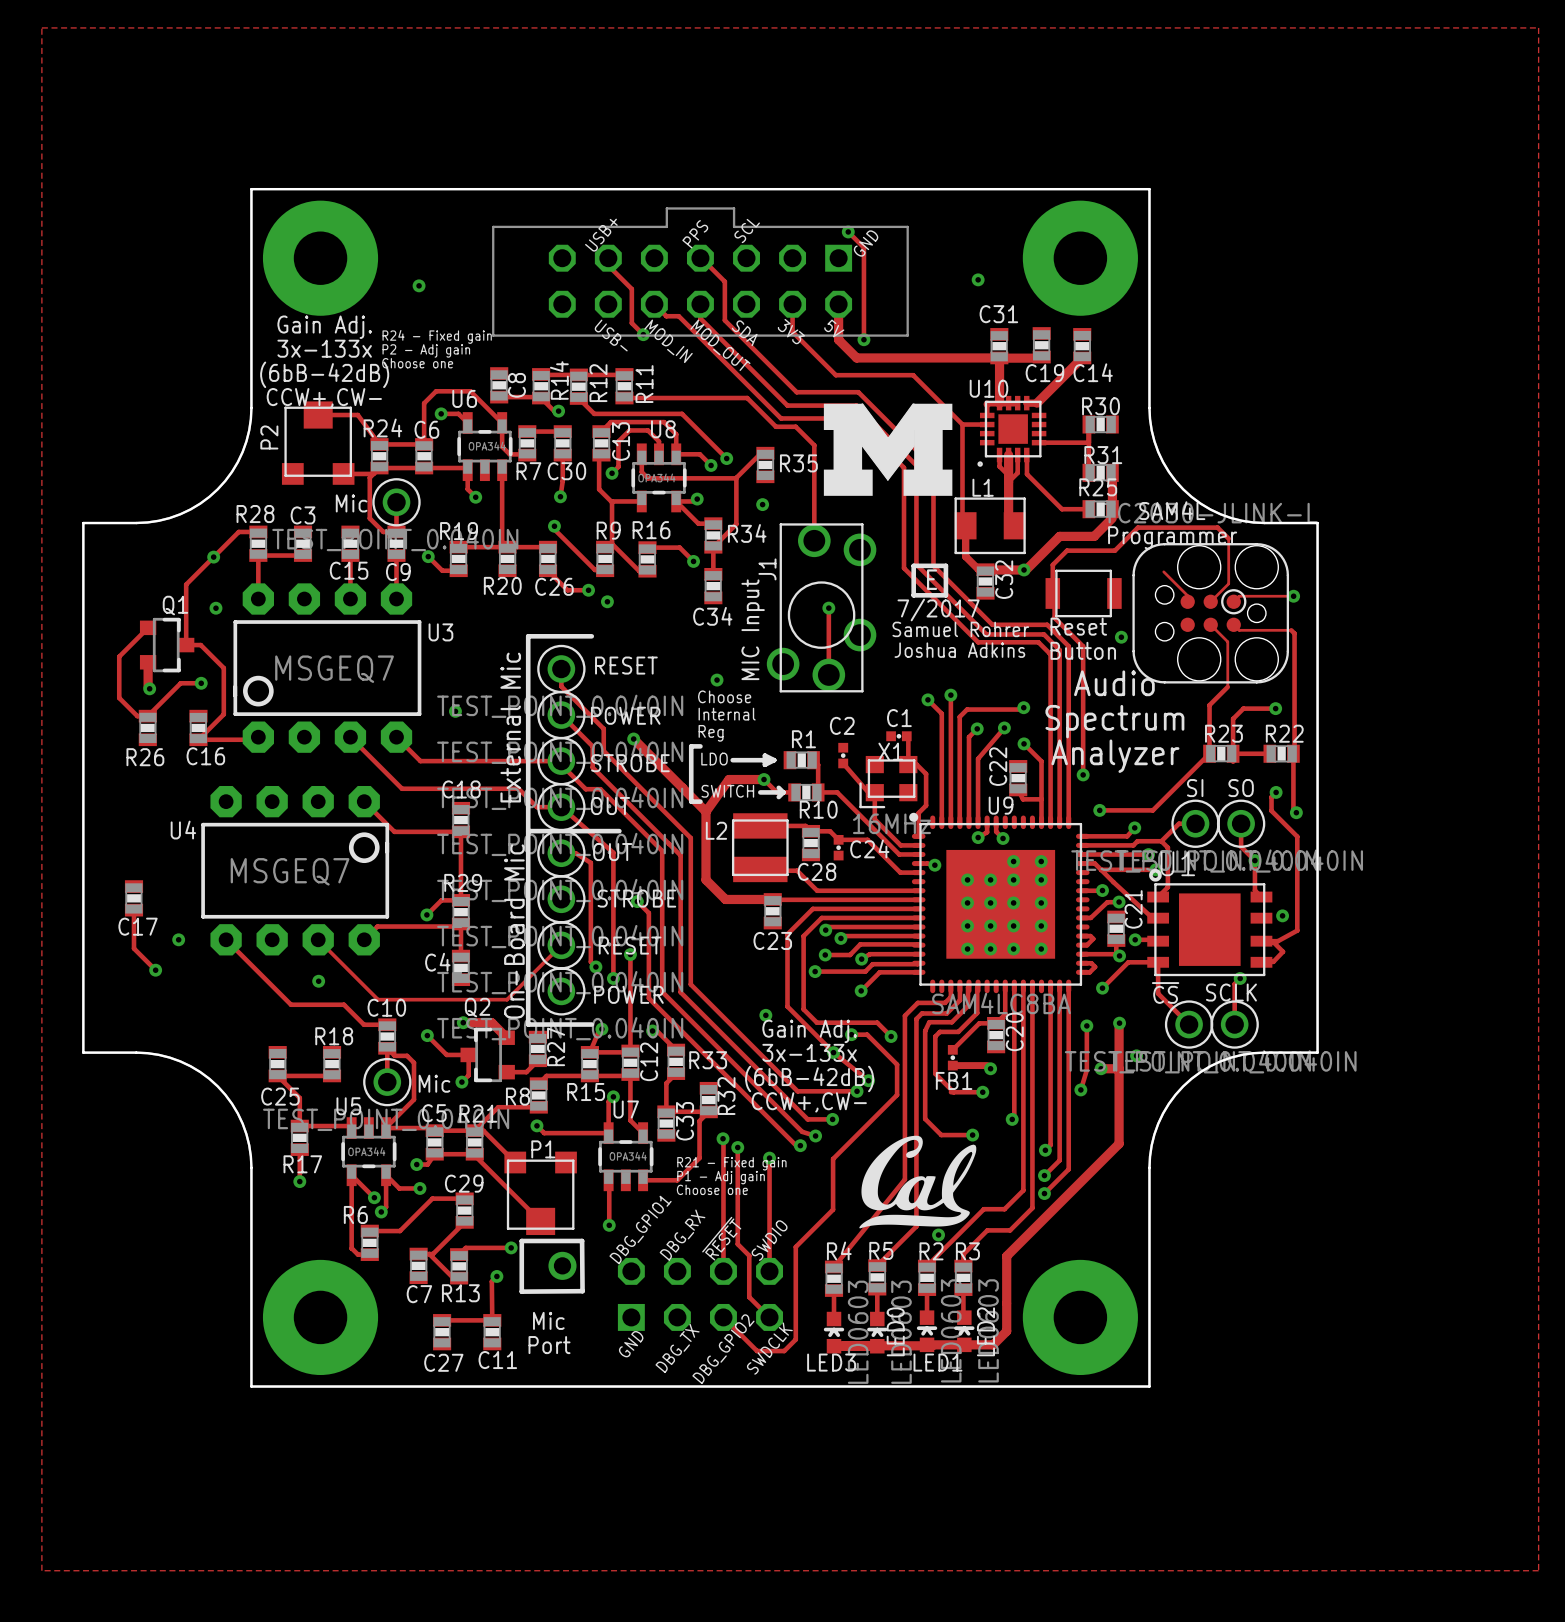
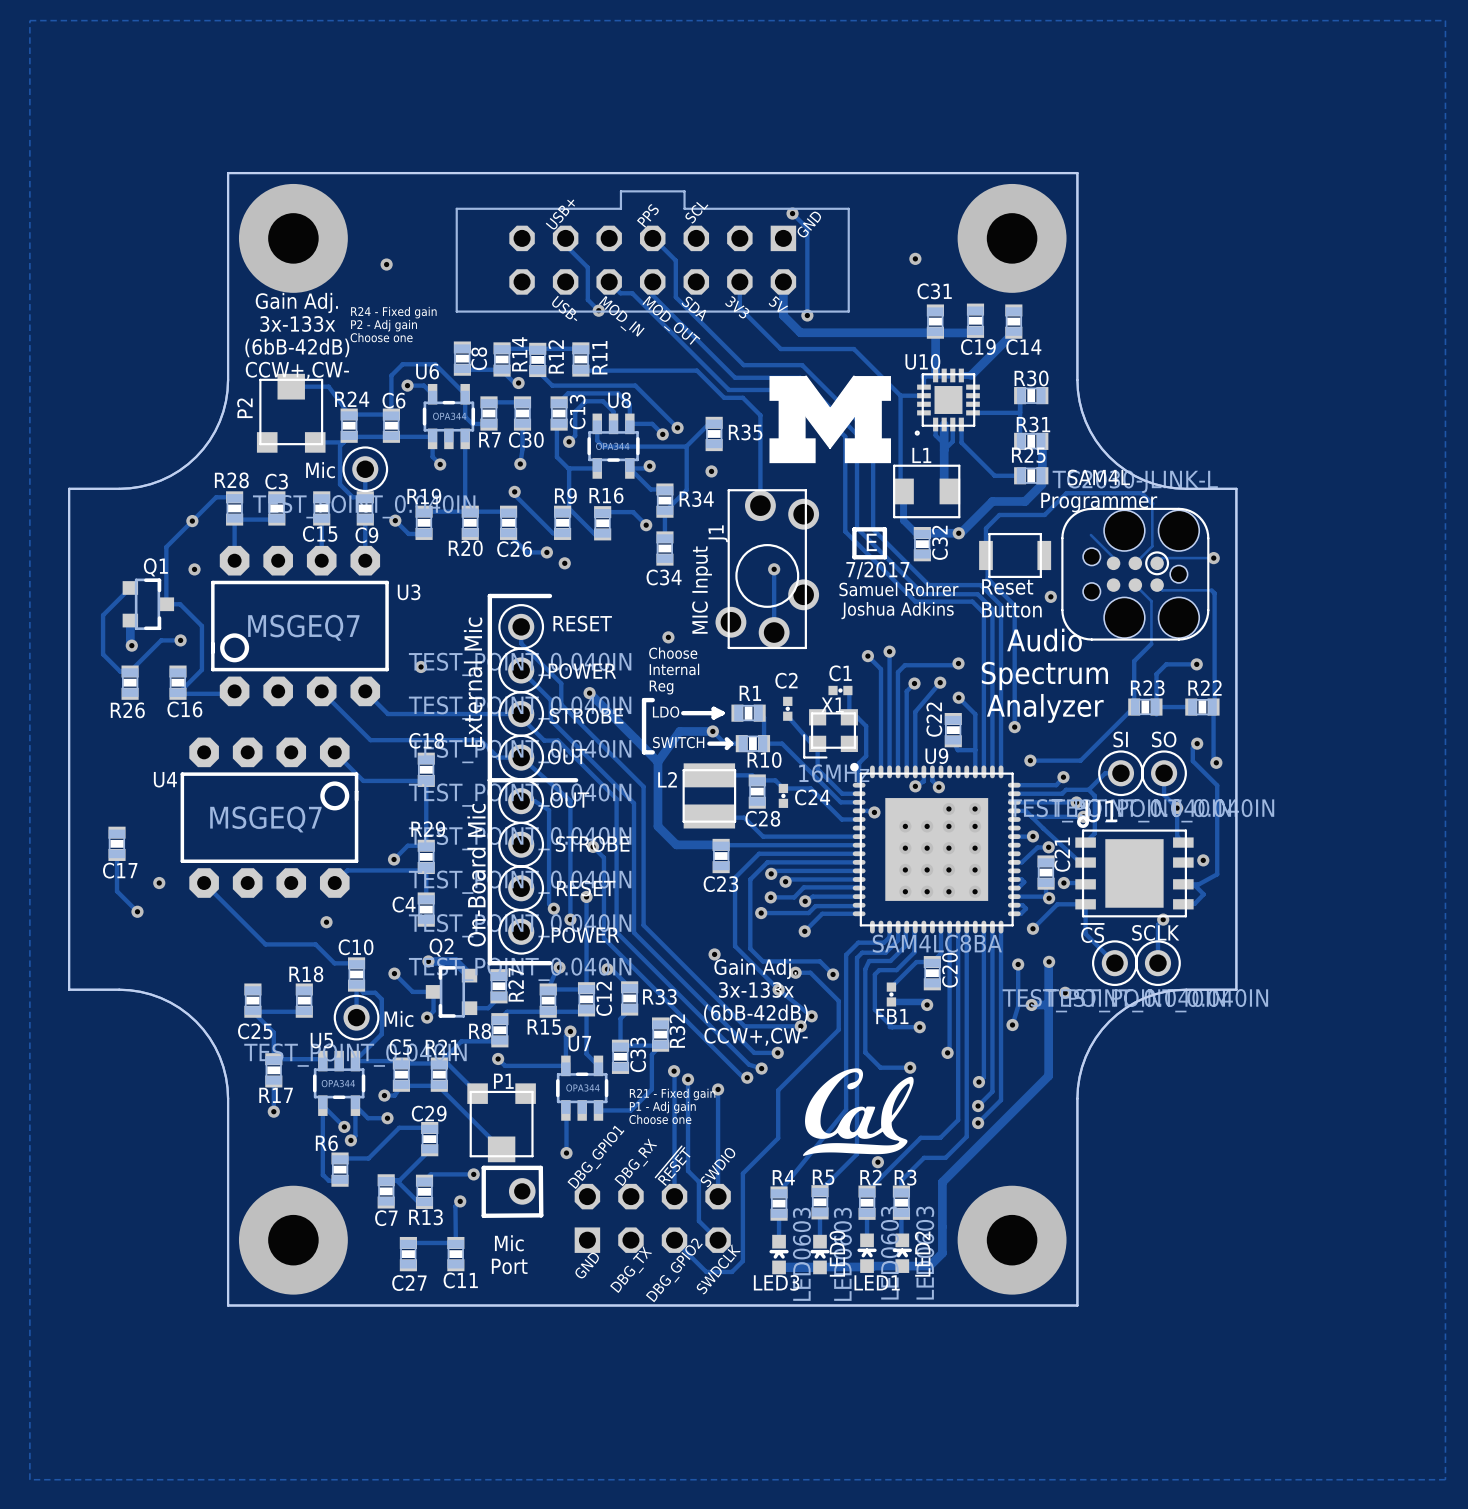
track: (318, 939) (378, 999) (507, 999) (561, 945) -> none
via position: (318, 981) -> (326, 922)

